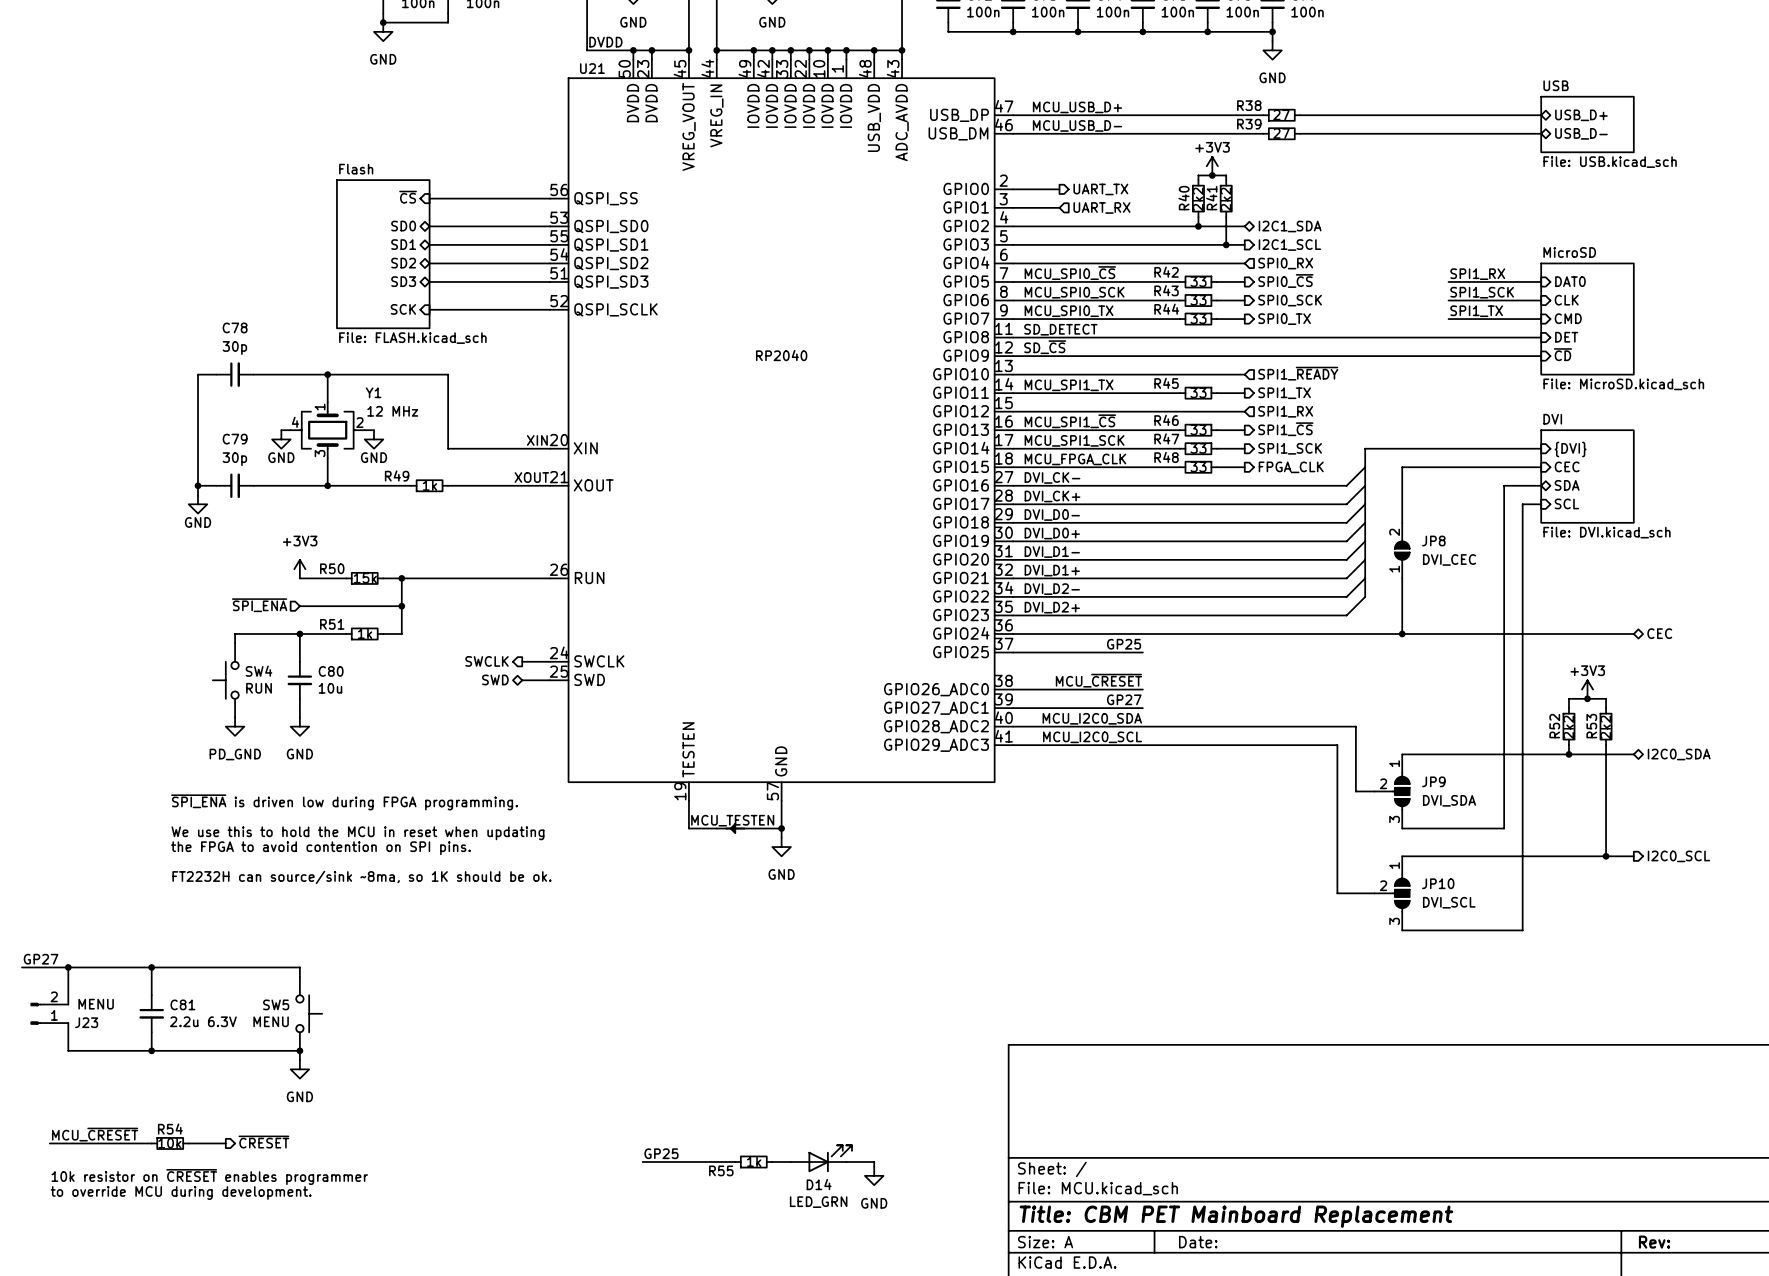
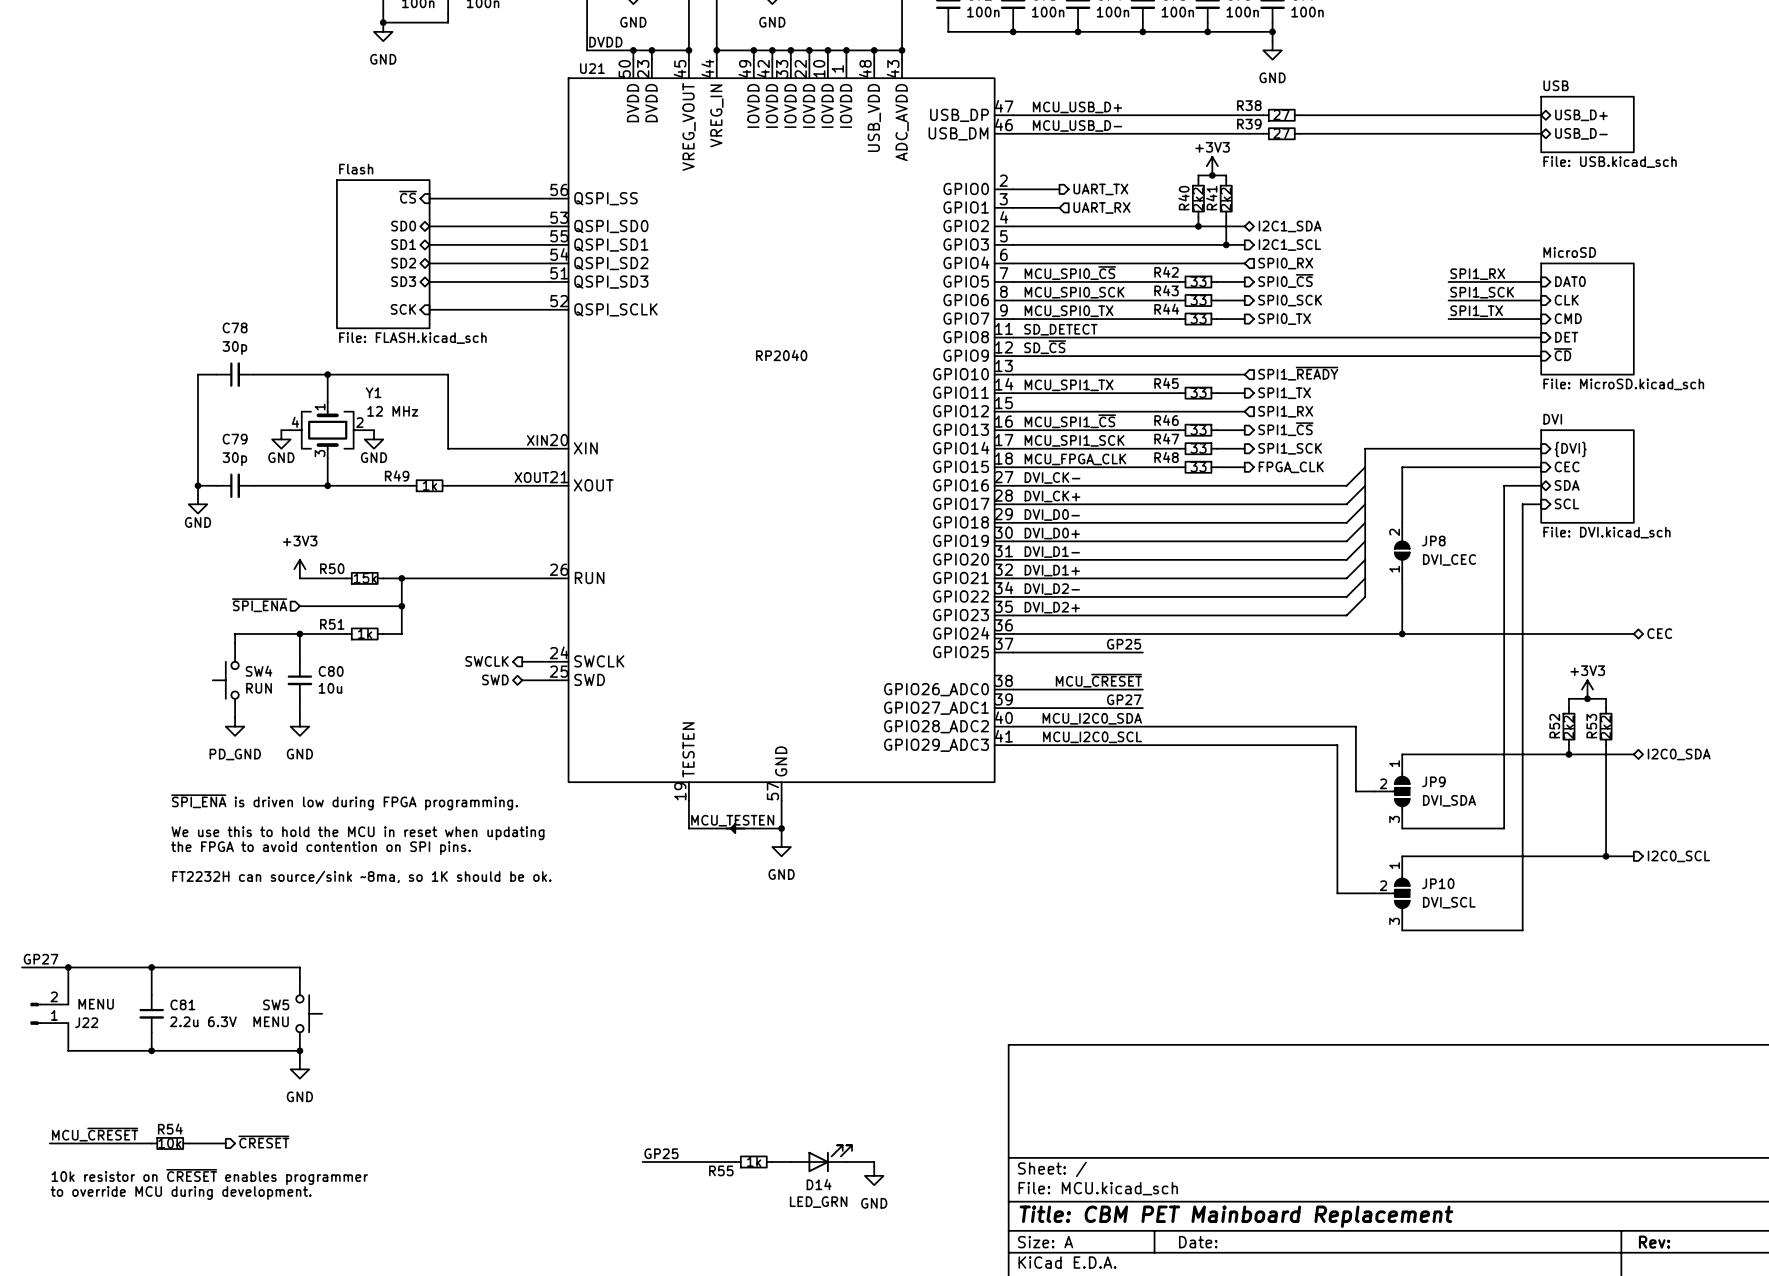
J23 name: J23 (86, 1022) -> J22 (86, 1022)

